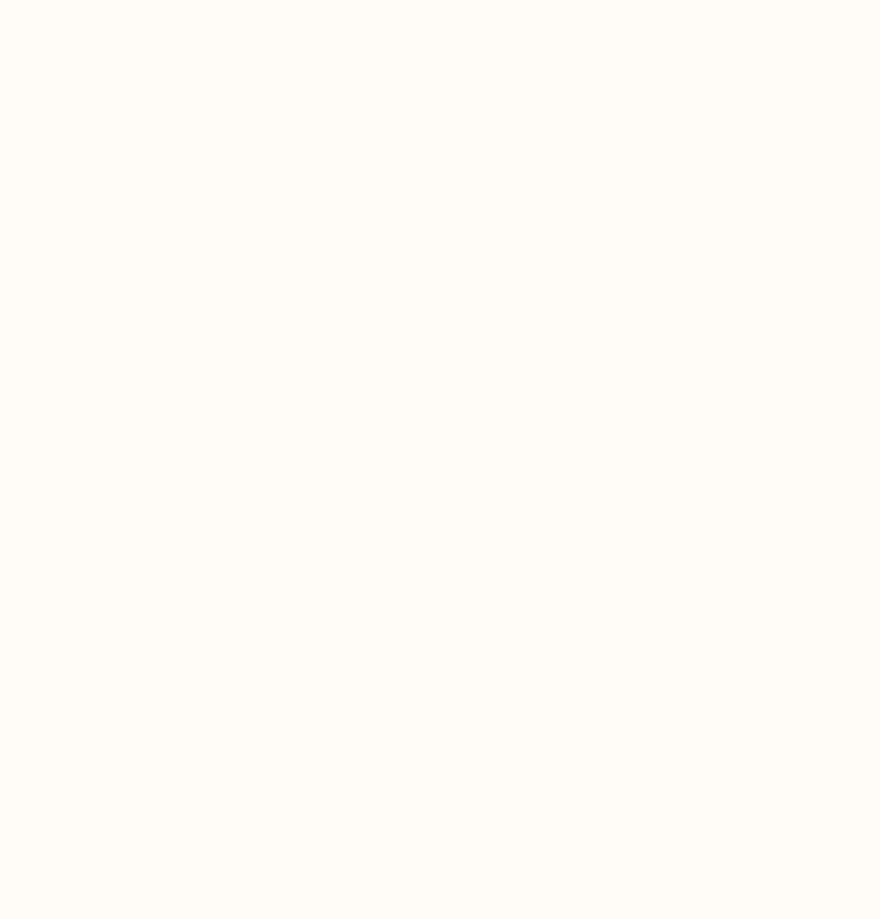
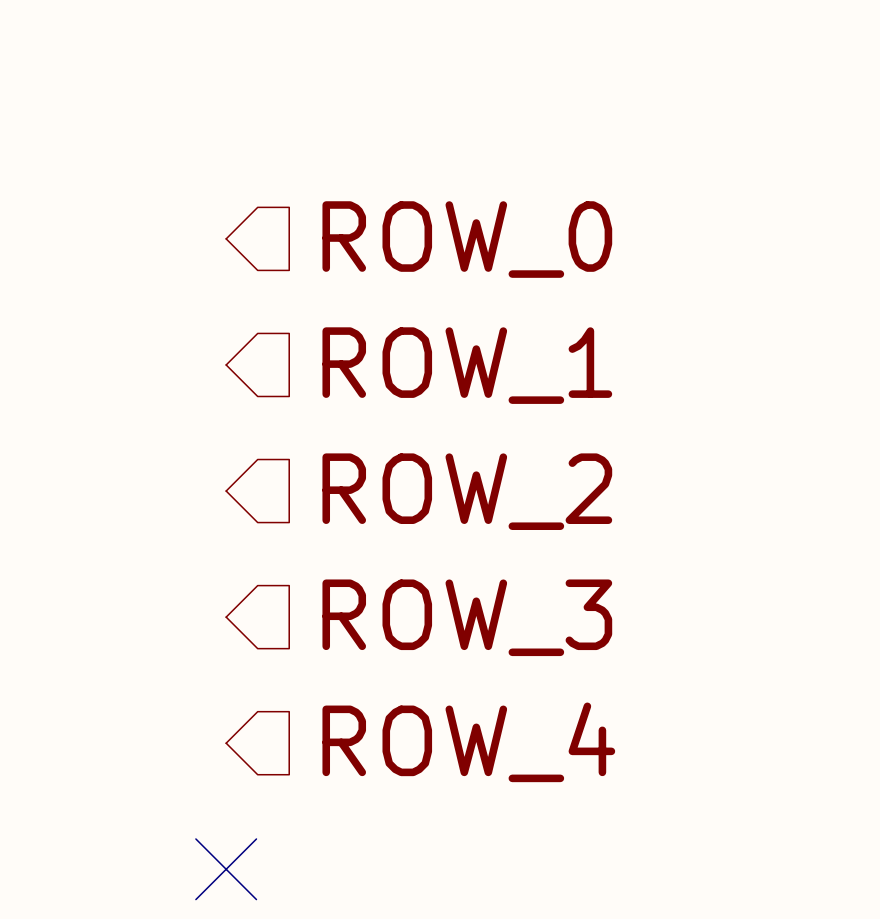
hierarchical label: none -> ROW_0 (467, 239)
hierarchical label: none -> ROW_1 (467, 365)
hierarchical label: none -> ROW_2 (467, 491)
hierarchical label: none -> ROW_3 (467, 617)
hierarchical label: none -> ROW_4 (468, 742)
no-connect mark: none -> (226, 869)

